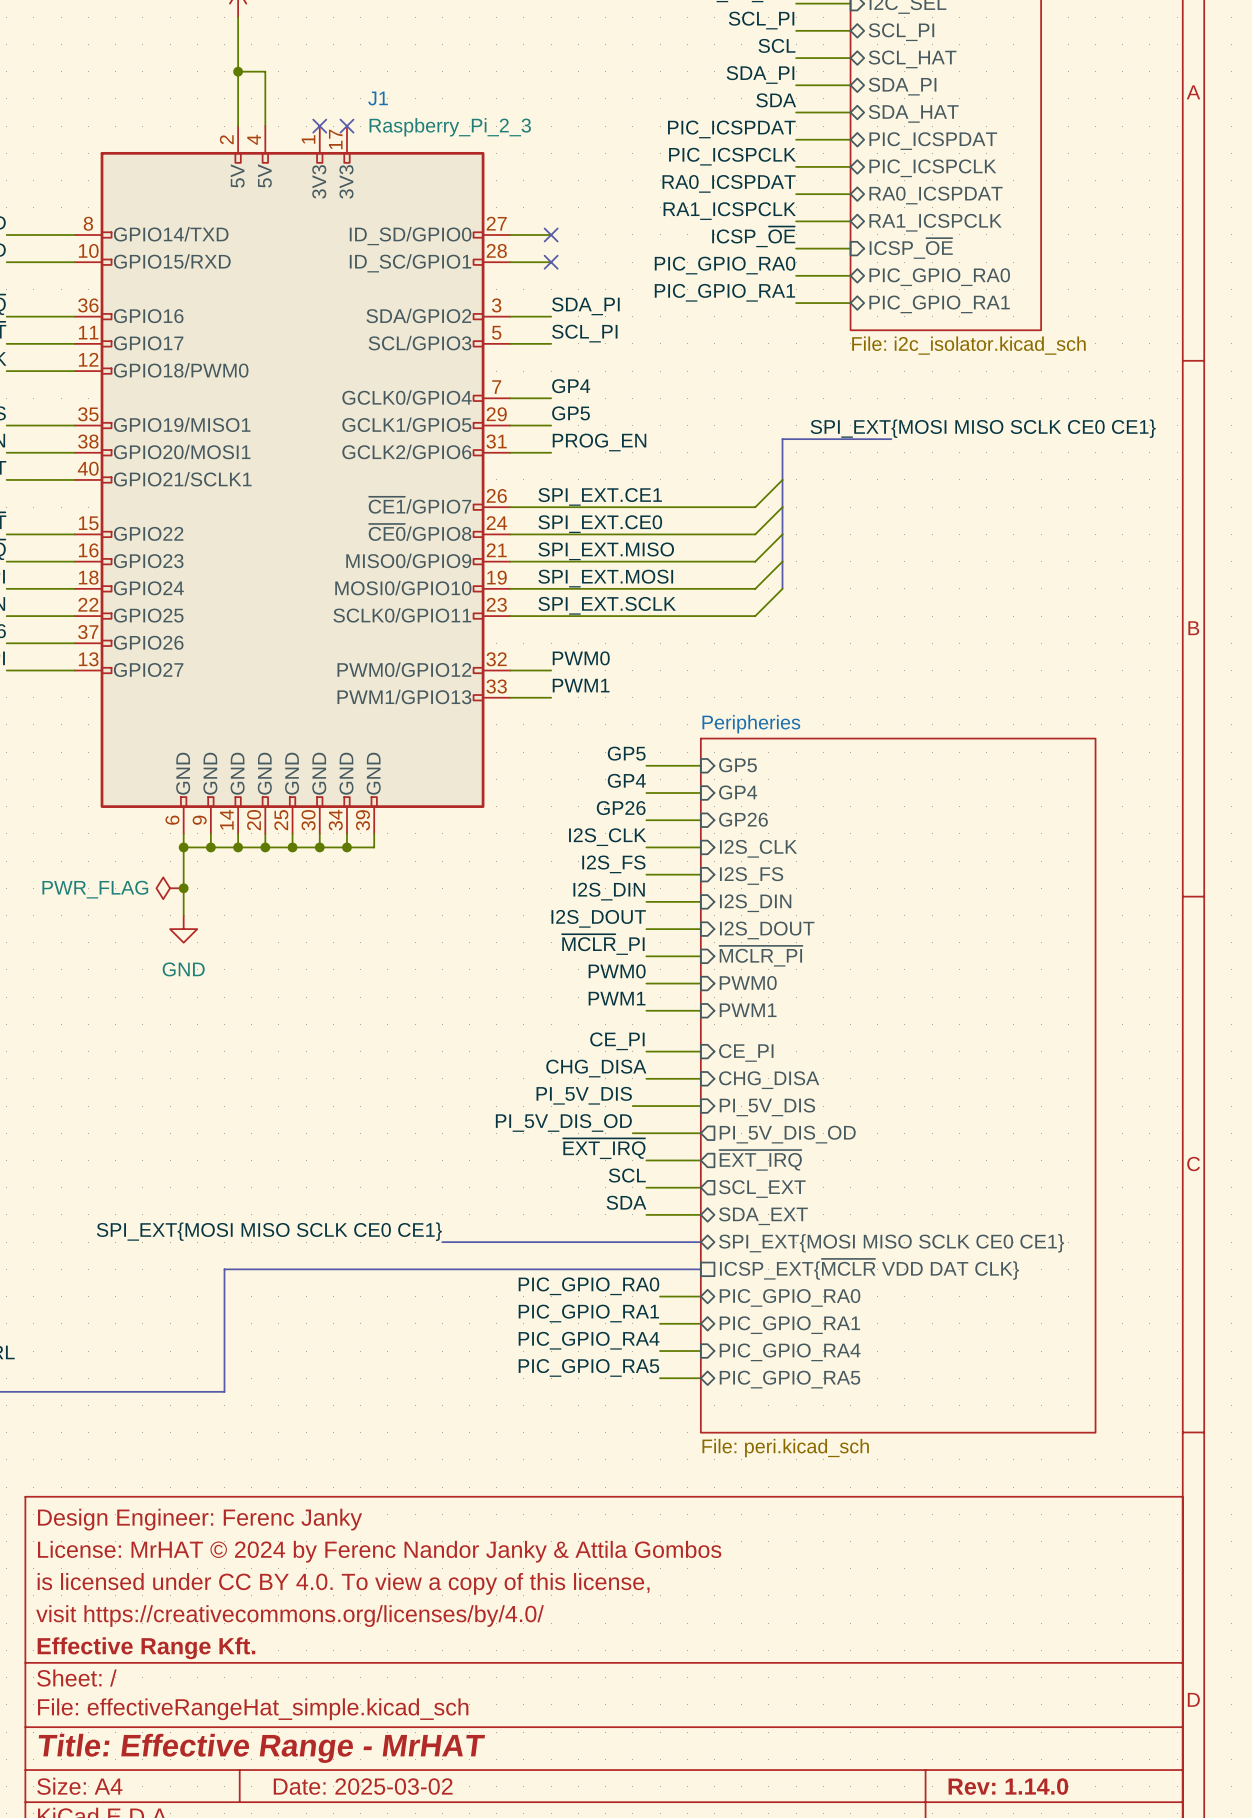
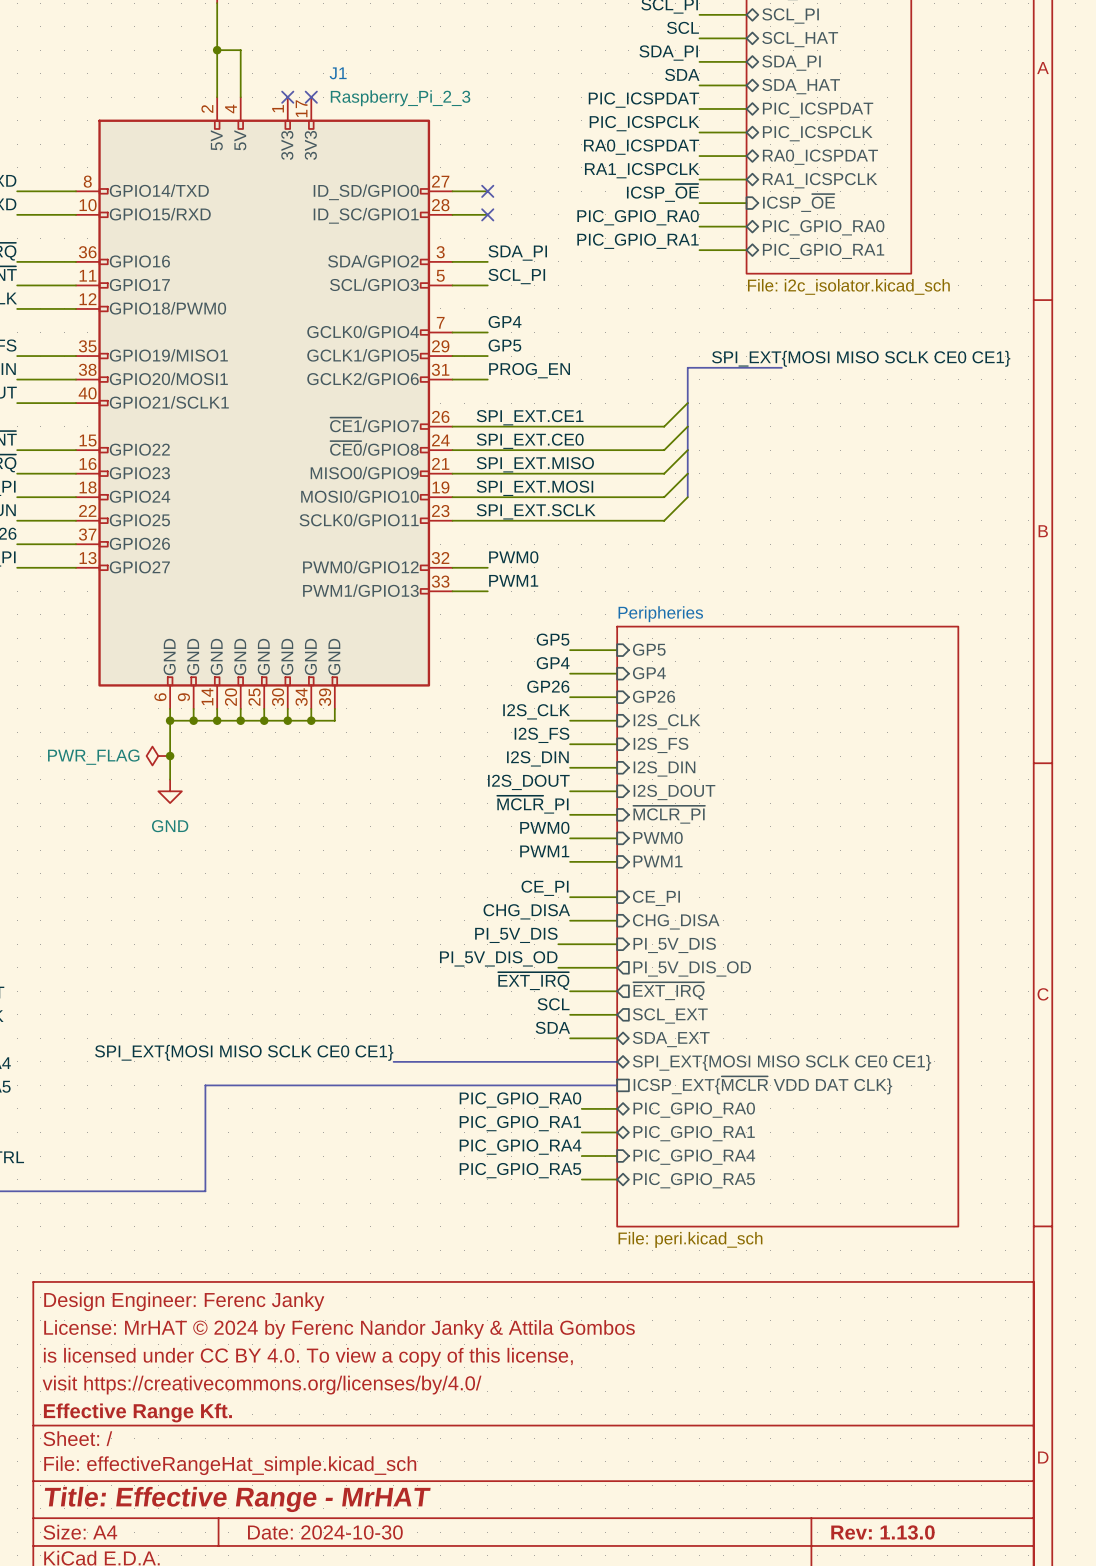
title block: Date: 2025-03-02 (363, 1786) -> Date: 2024-10-30 (325, 1532)
title block: Rev: 1.14.0 (1008, 1786) -> Rev: 1.13.0 (882, 1532)

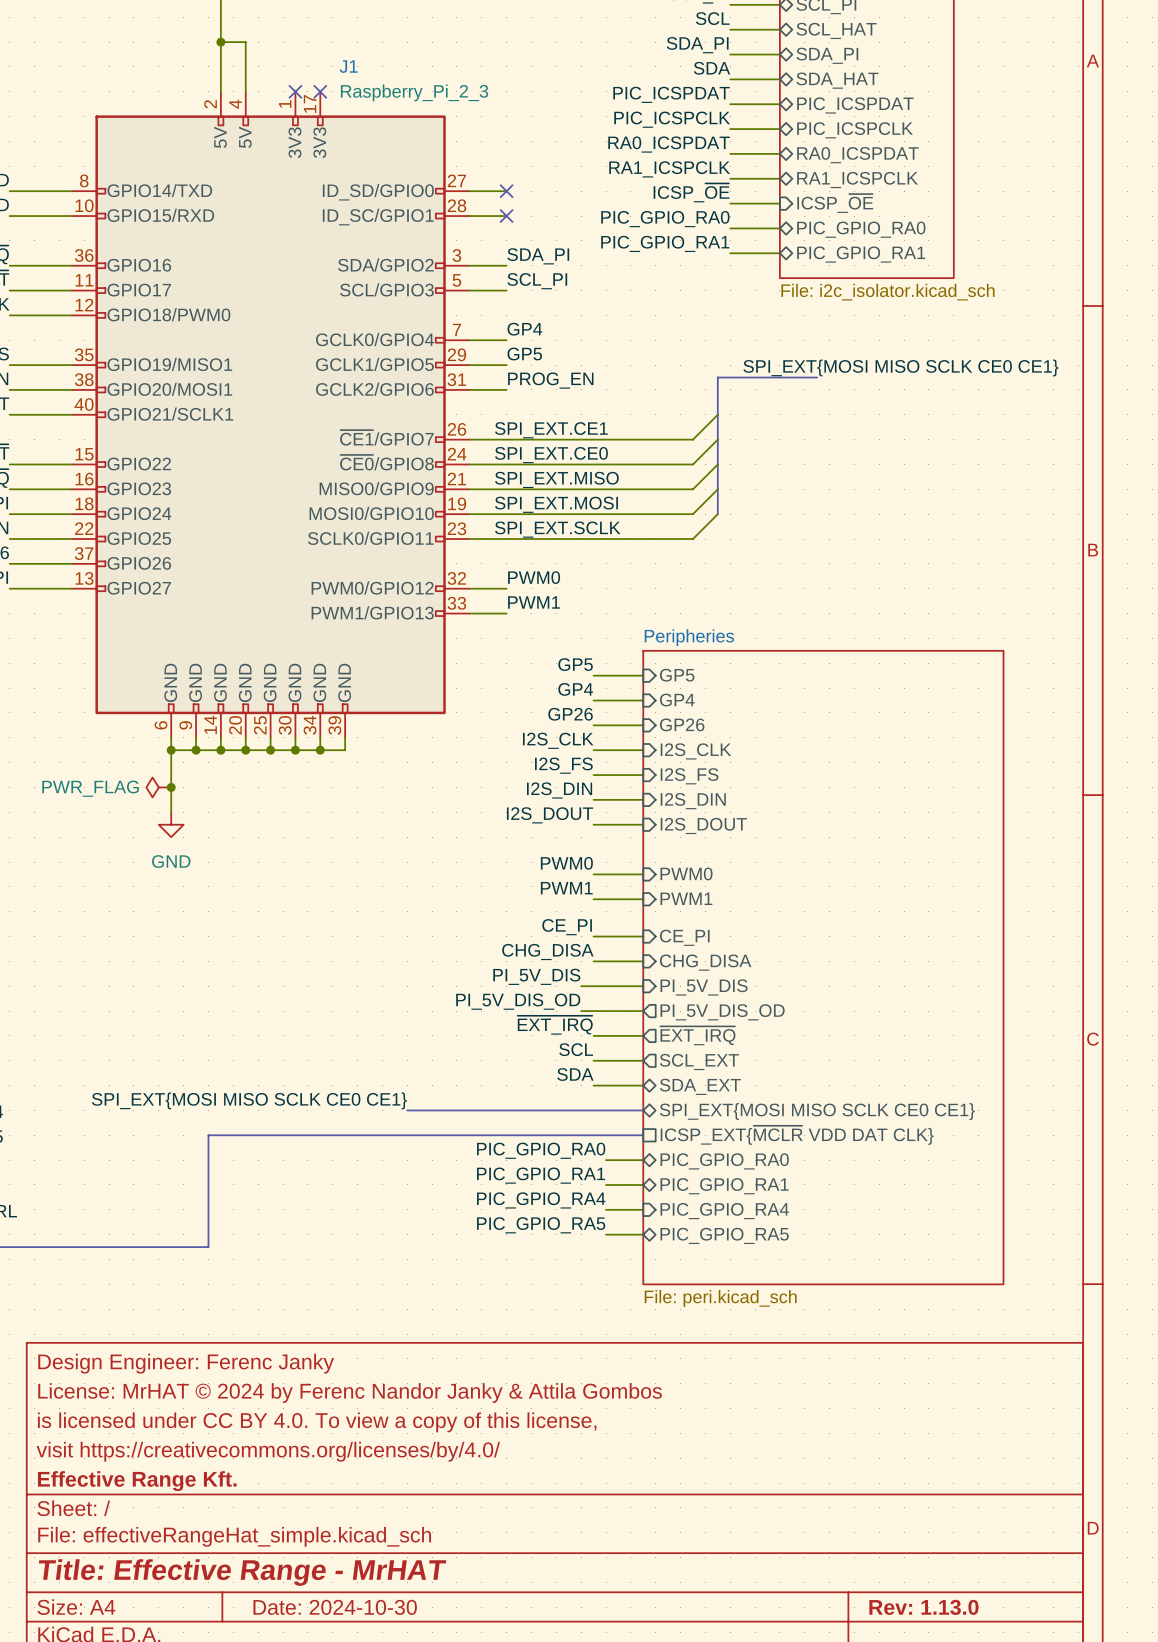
label: ~{MCLR}_PI (532, 804) -> none
wire: (570, 814) (617, 814) -> none
sheet pin: ~{MCLR_PI} (669, 814) -> none

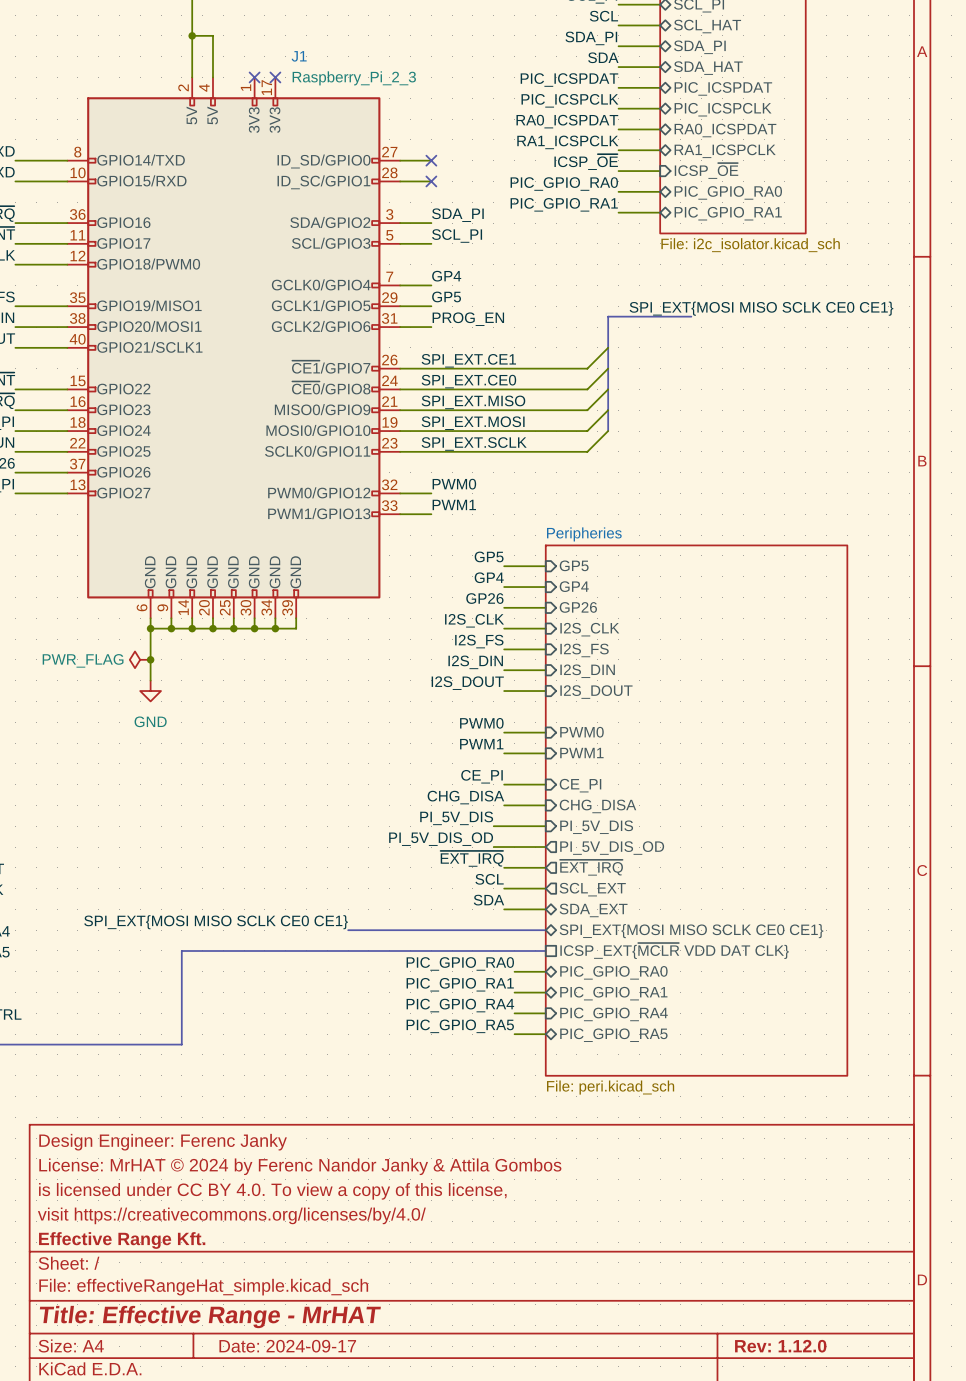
title block: Date: 2024-10-30 (335, 1607) -> Date: 2024-09-17 (287, 1346)
title block: Rev: 1.13.0 (923, 1607) -> Rev: 1.12.0 (780, 1346)

